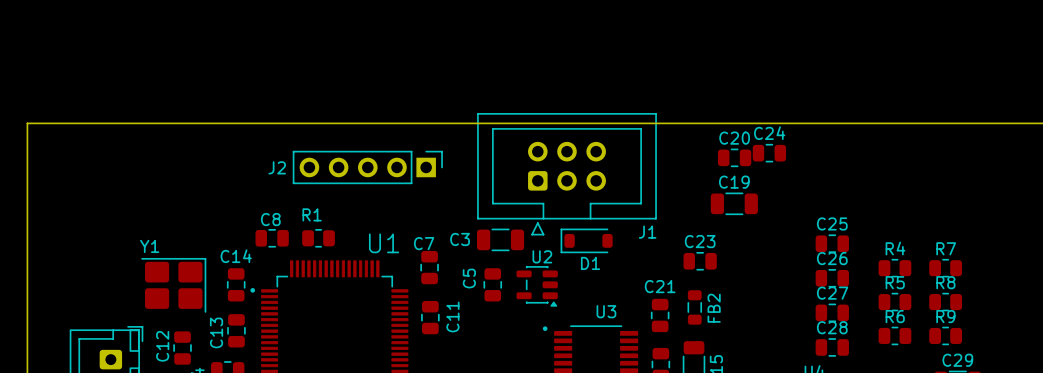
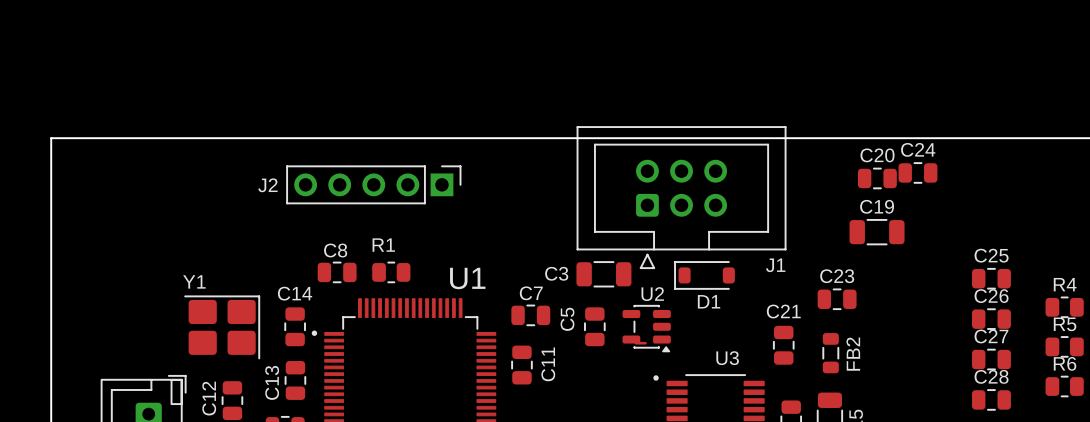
J2 position: (367, 167) -> (373, 184)
C7 rotation: 0° (429, 267) -> 90° clockwise (530, 315)
track: none -> (635, 343) (645, 343)
C21 position: (660, 315) -> (783, 345)

